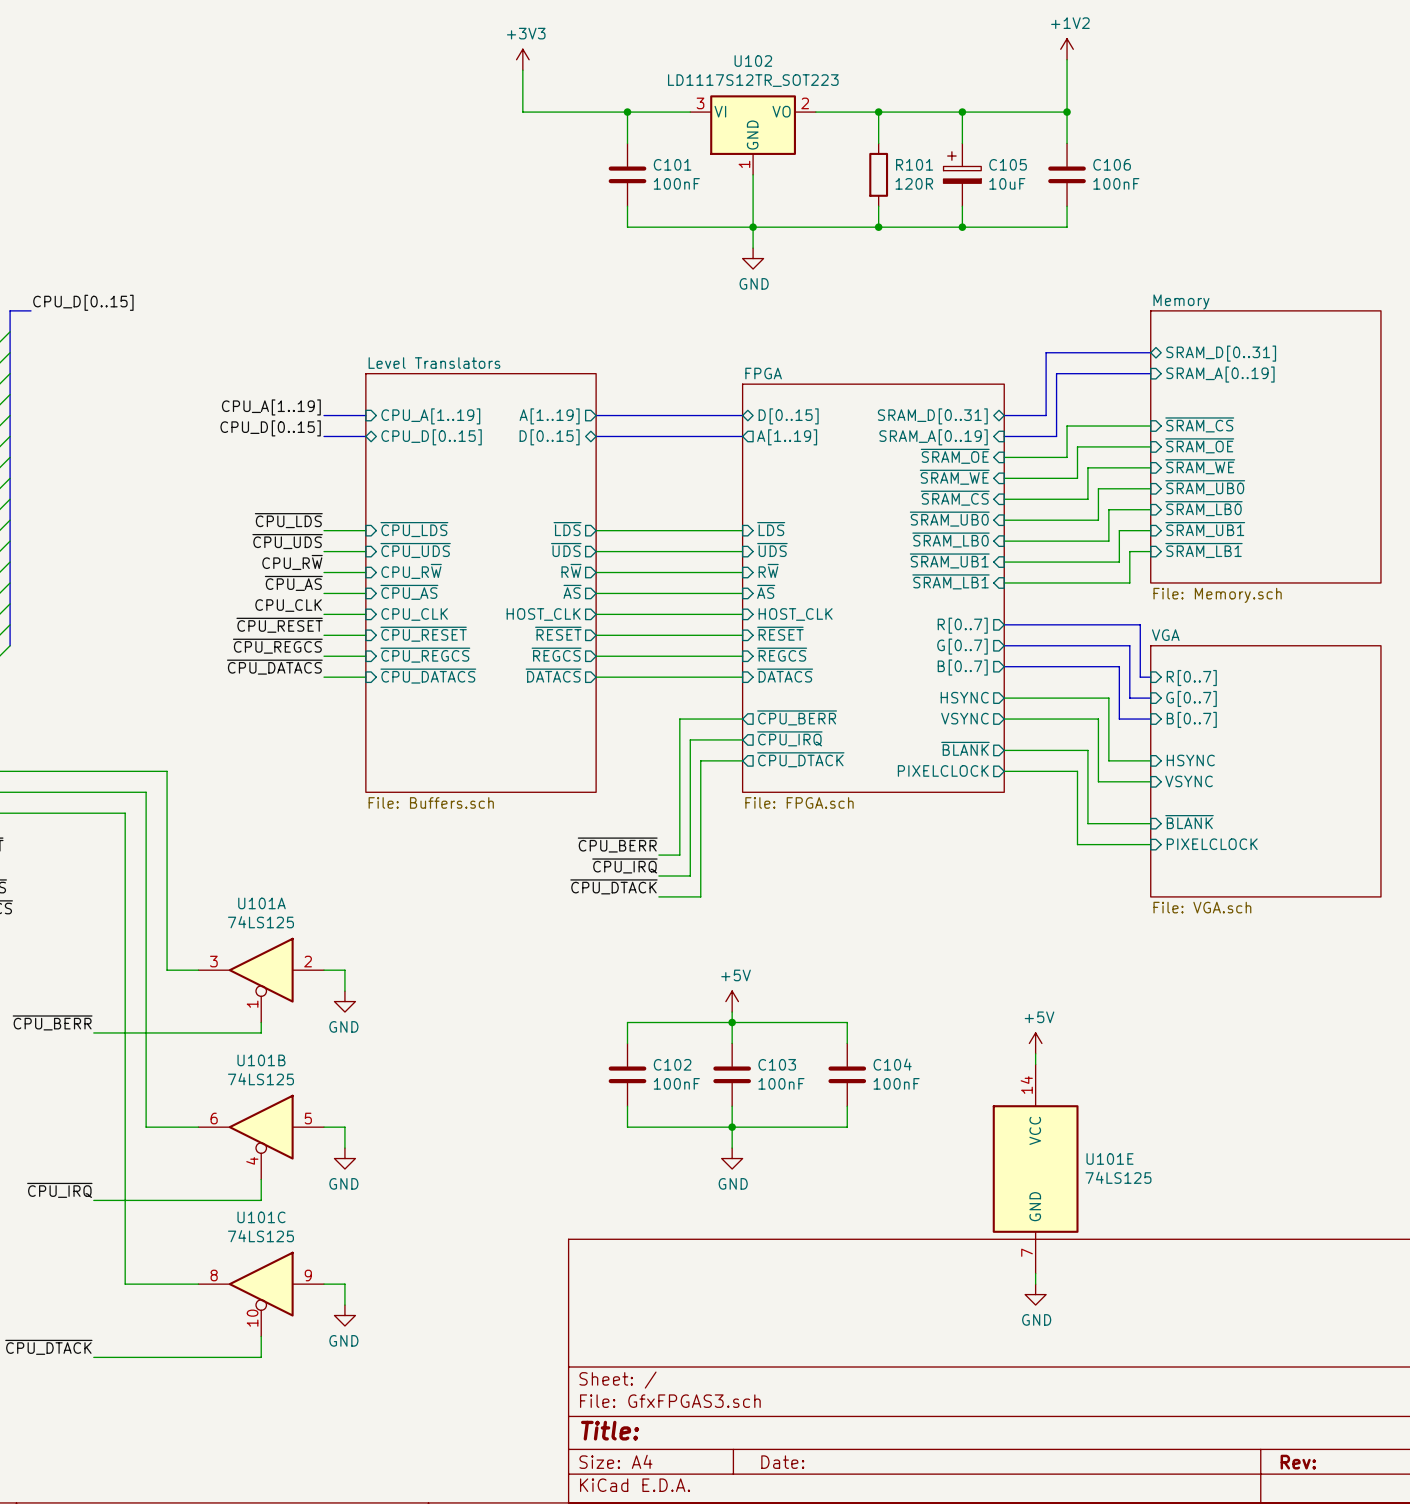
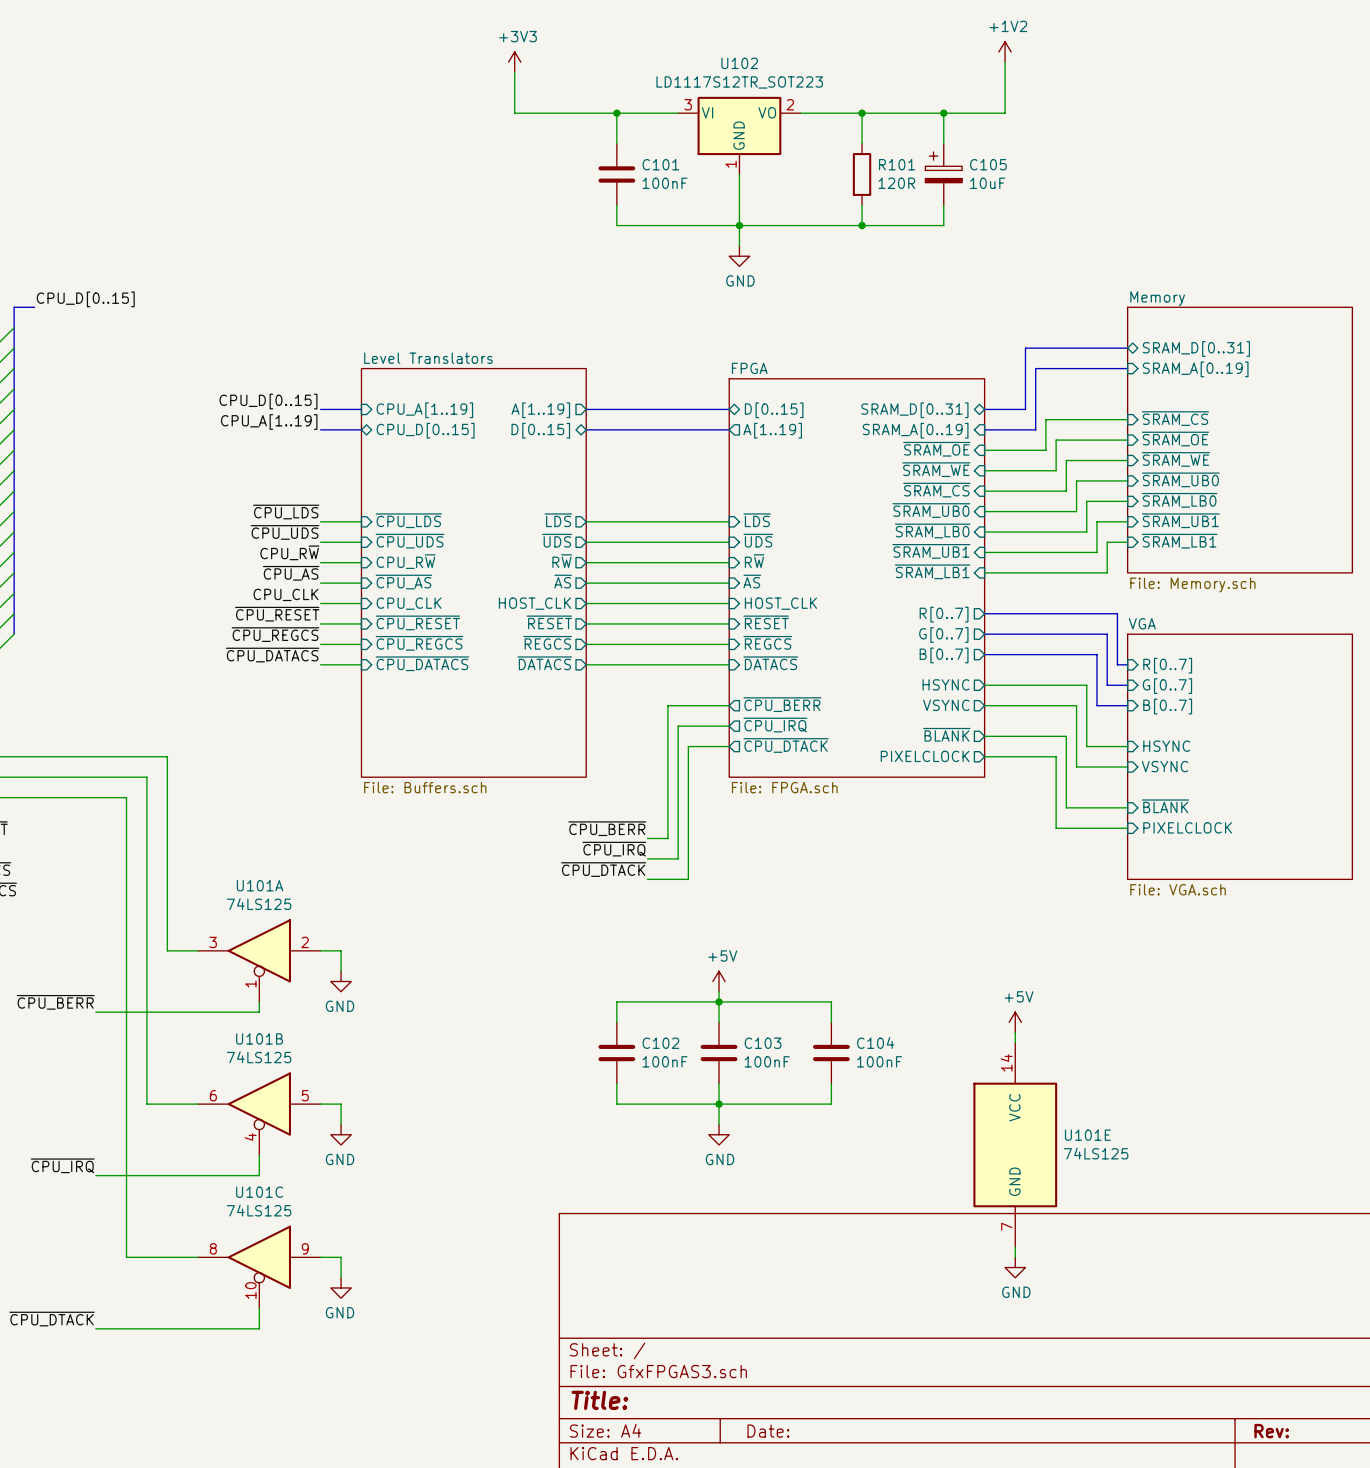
power symbol position: +1V2 (1067, 49) -> +1V2 (1005, 51)
wire: (1067, 59) (1067, 143) -> none
wire: (1025, 112) (1067, 112) -> (1005, 113) (1005, 62)
junction: (1067, 112) -> none
C106: 100nF (1067, 174) -> none
wire: (1067, 206) (1067, 227) (962, 227) -> none
junction: (962, 227) -> none
label: CPU_A[1..19] (271, 407) -> CPU_D[0..15] (268, 401)
label: CPU_D[0..15] (270, 428) -> CPU_A[1..19] (269, 421)

